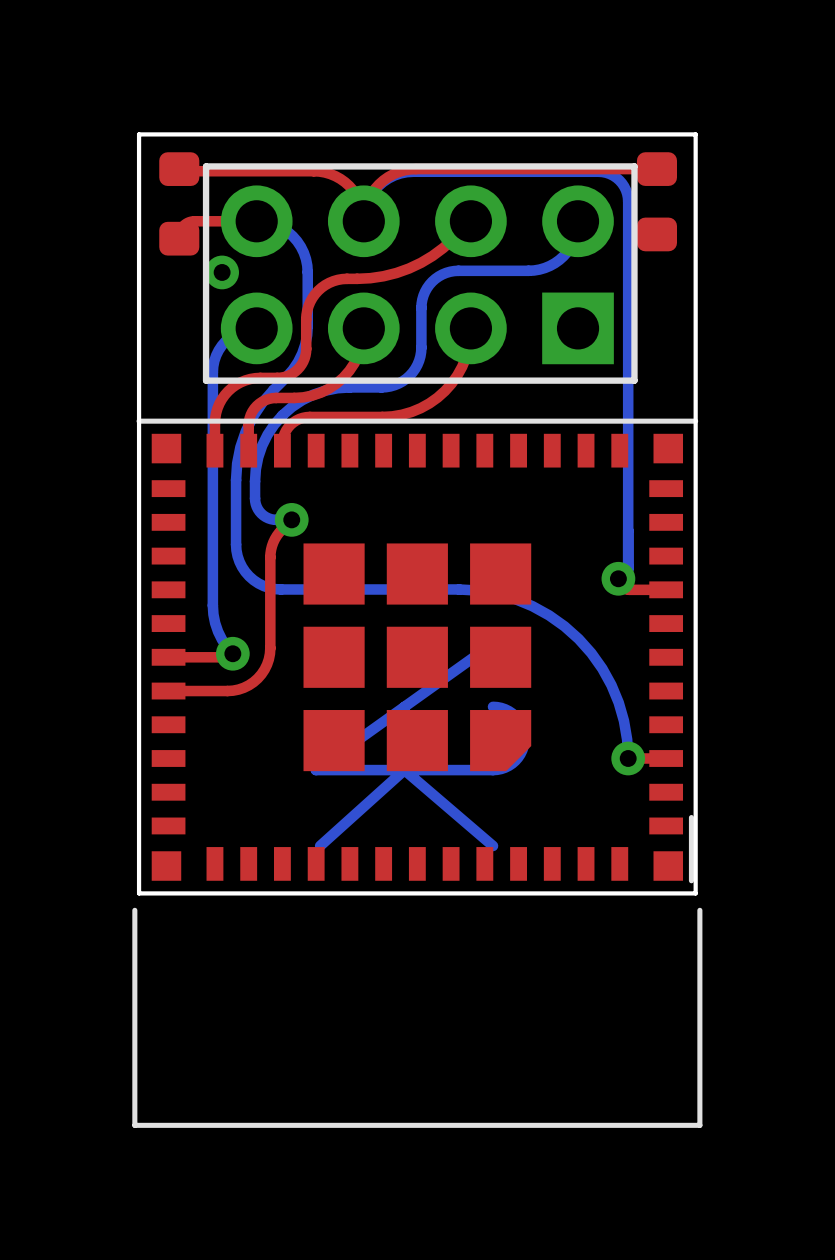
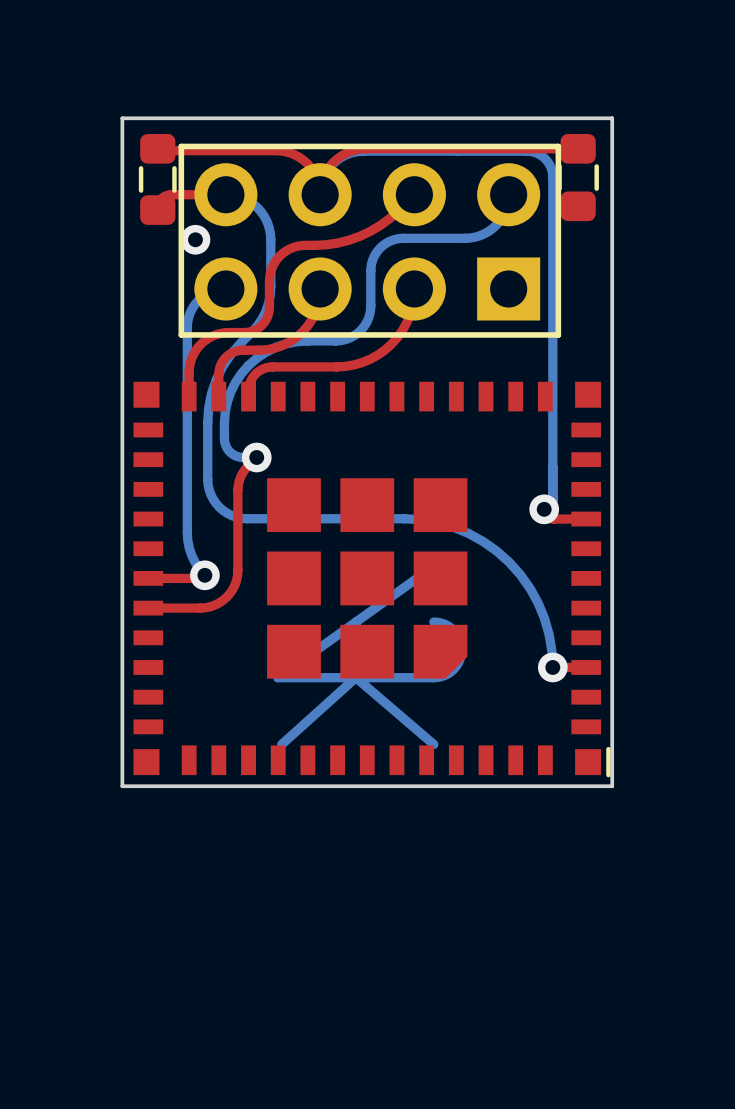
part footprint: [159, 152, 200, 256] -> [138, 133, 177, 225]
part footprint: [636, 152, 678, 252] -> [557, 133, 599, 222]
part: none -> (372, 579)
part: (417, 773) -> none

